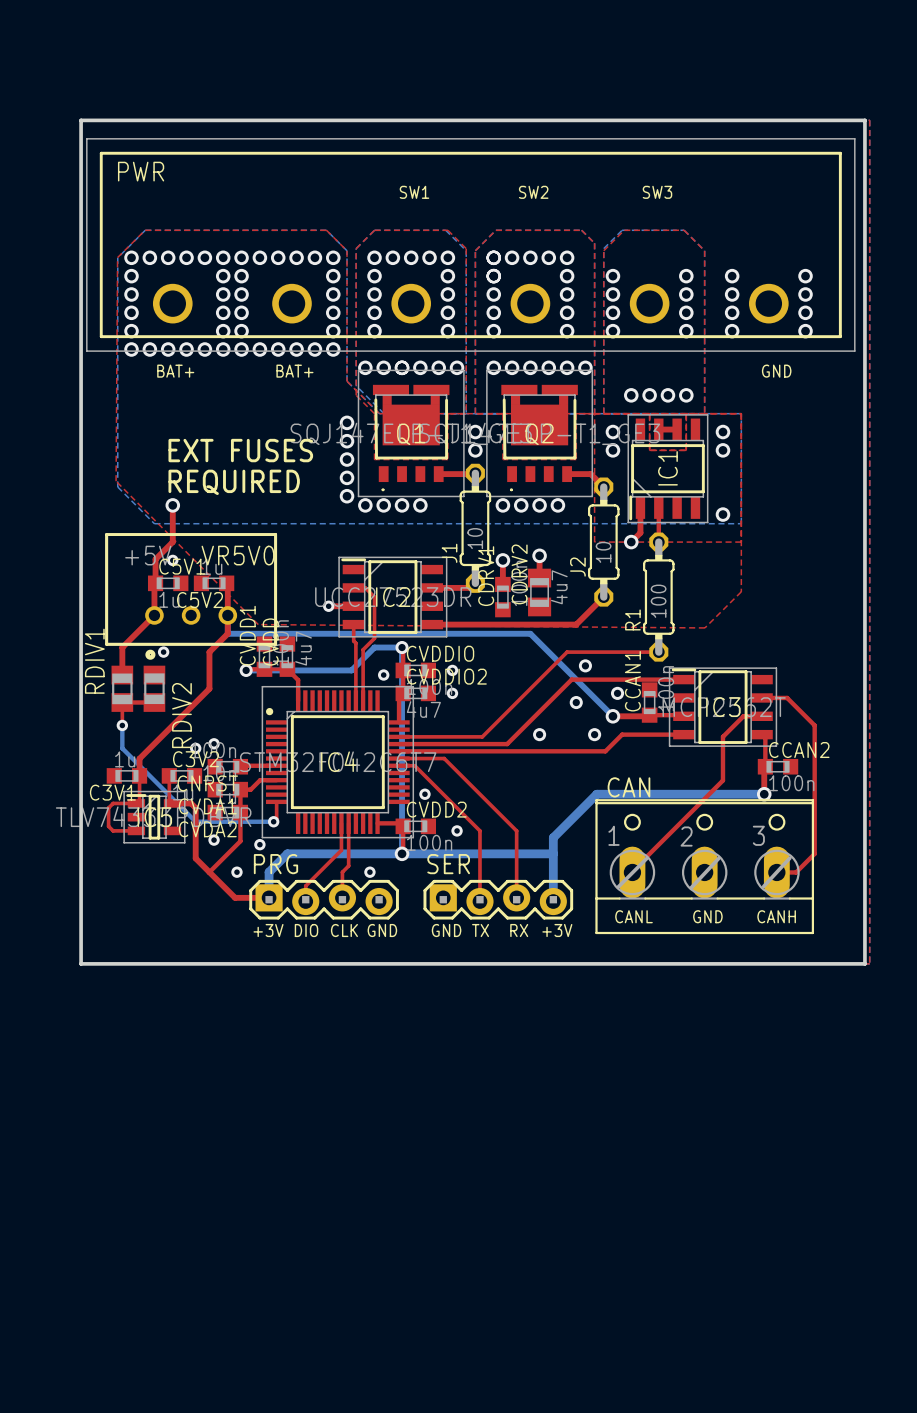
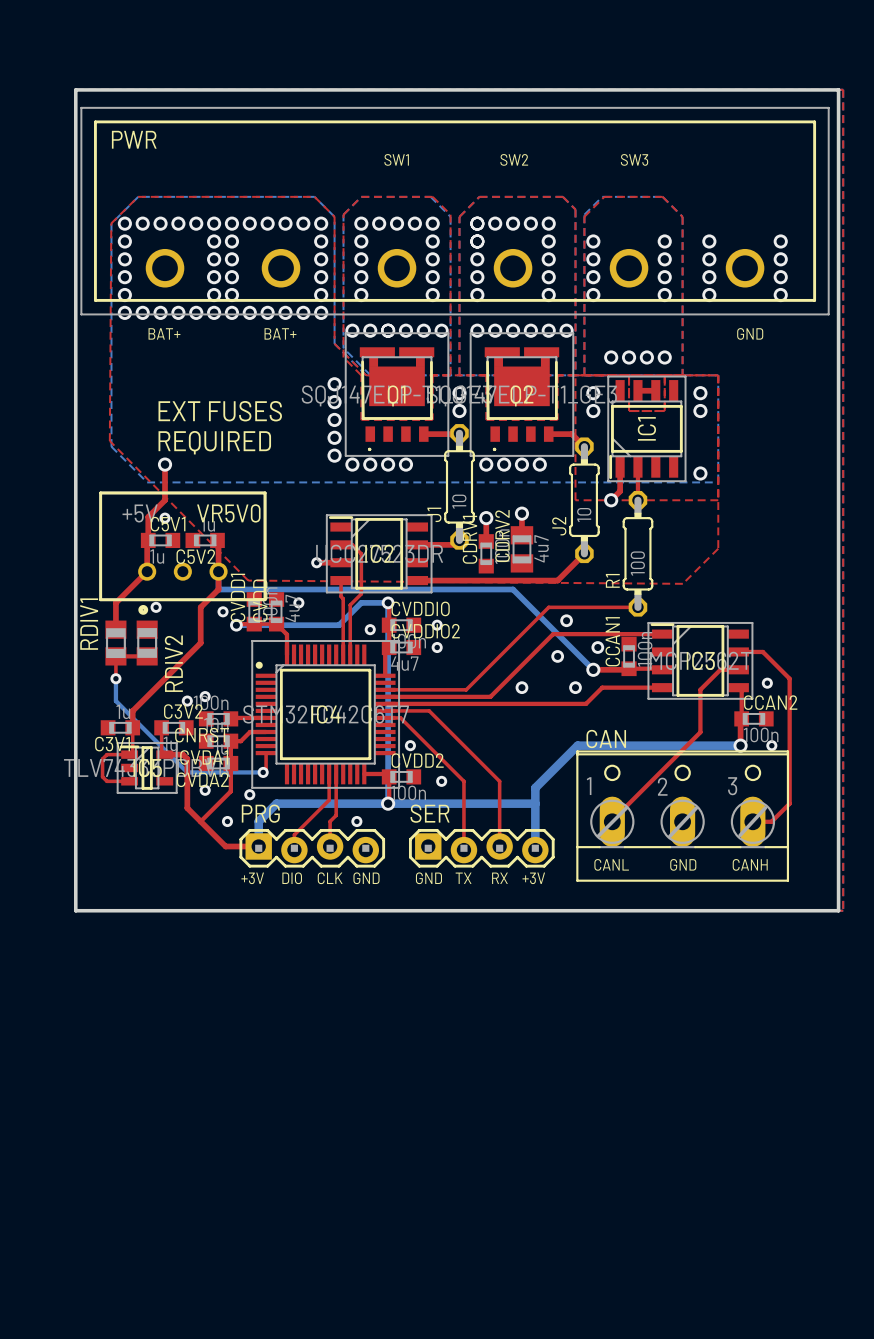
via: none -> (298, 602)
via: none -> (223, 611)
via: none -> (767, 683)
via: none -> (771, 745)

